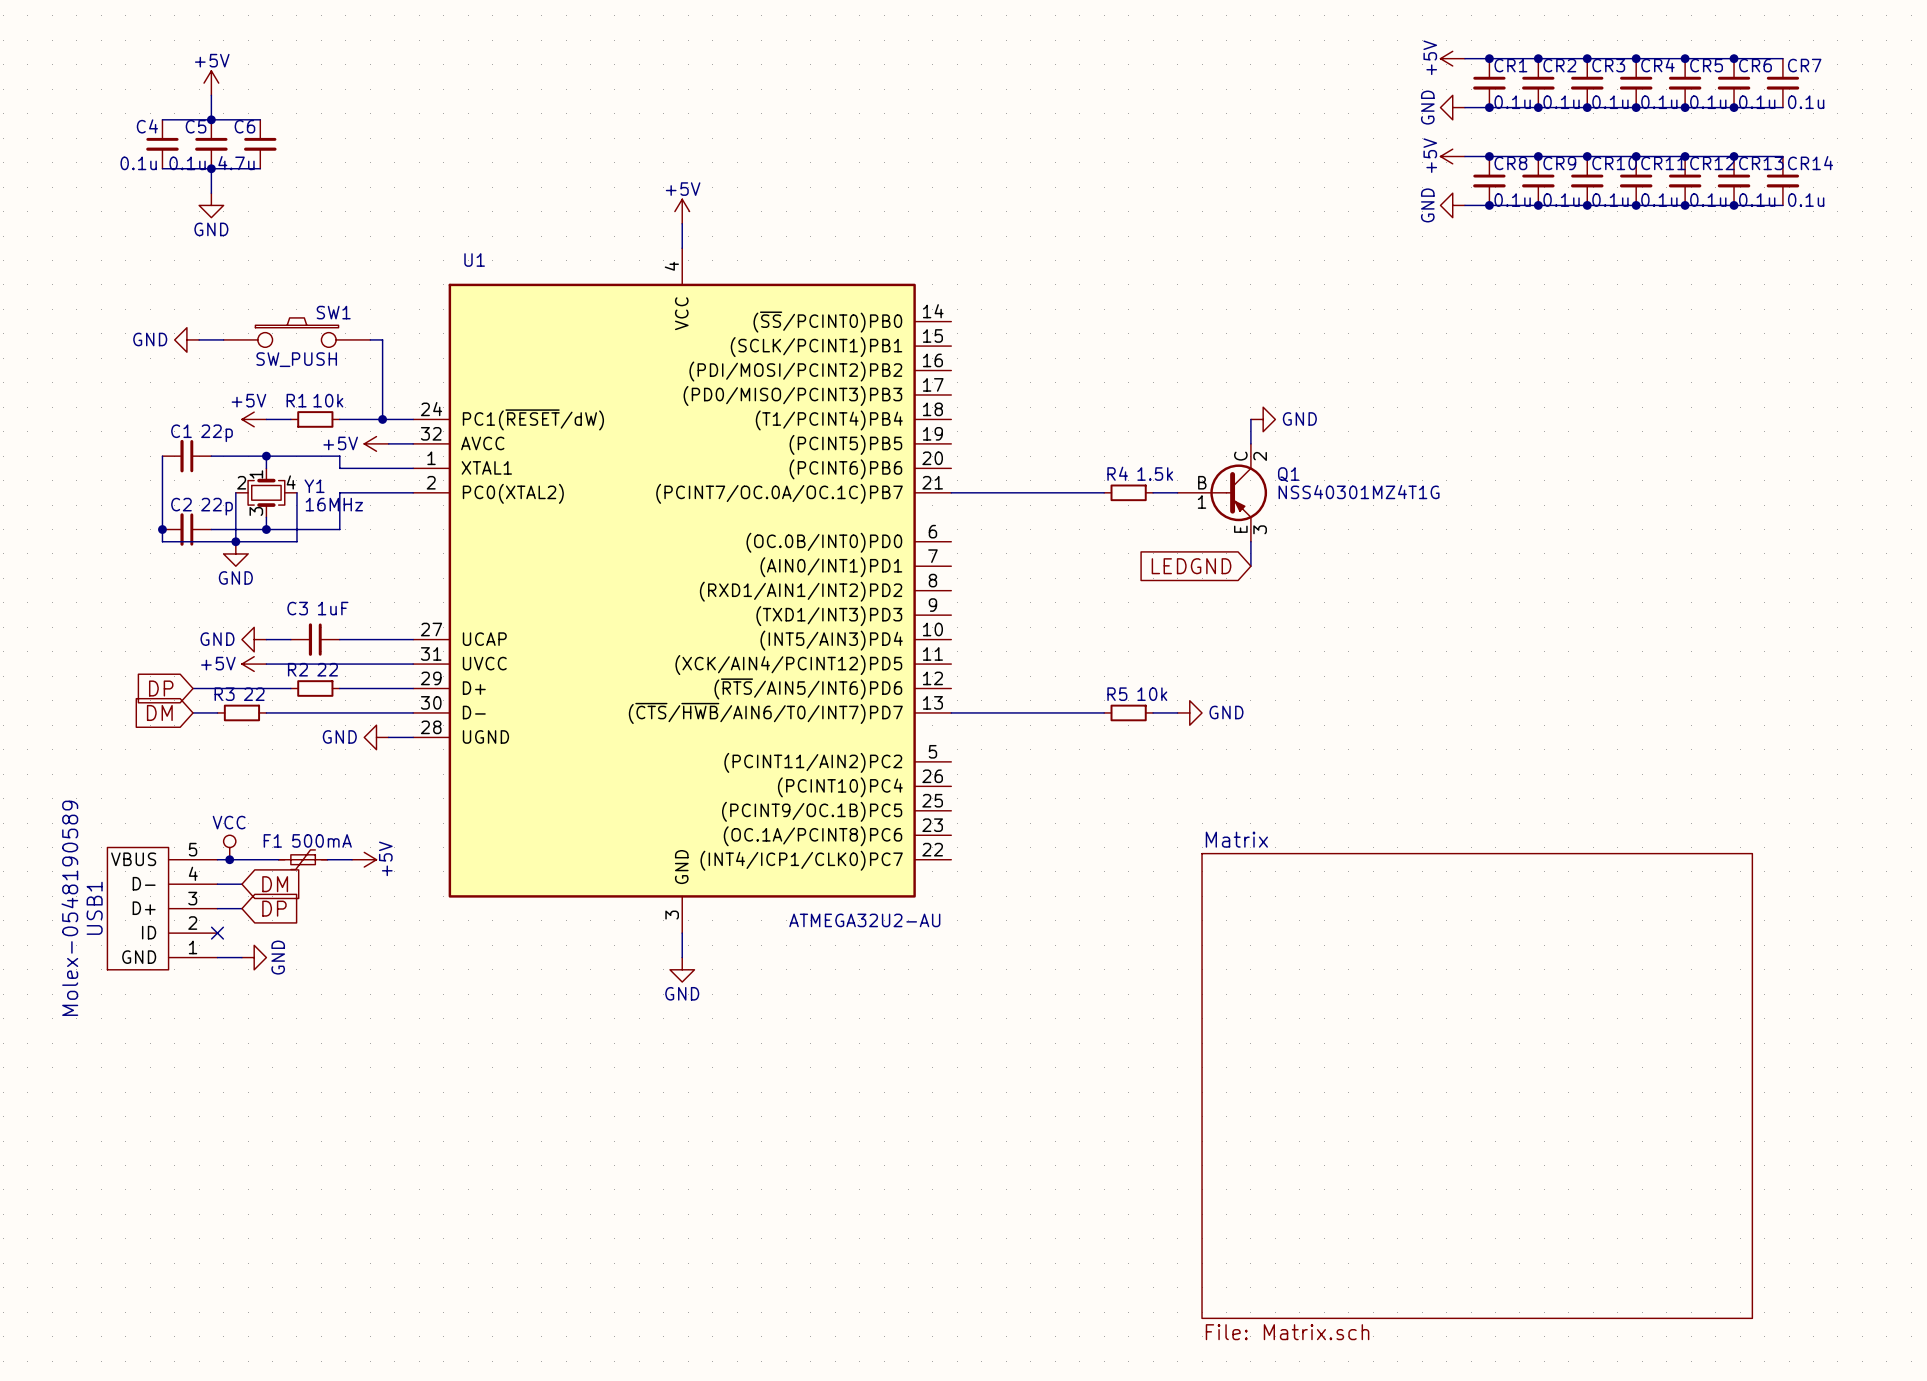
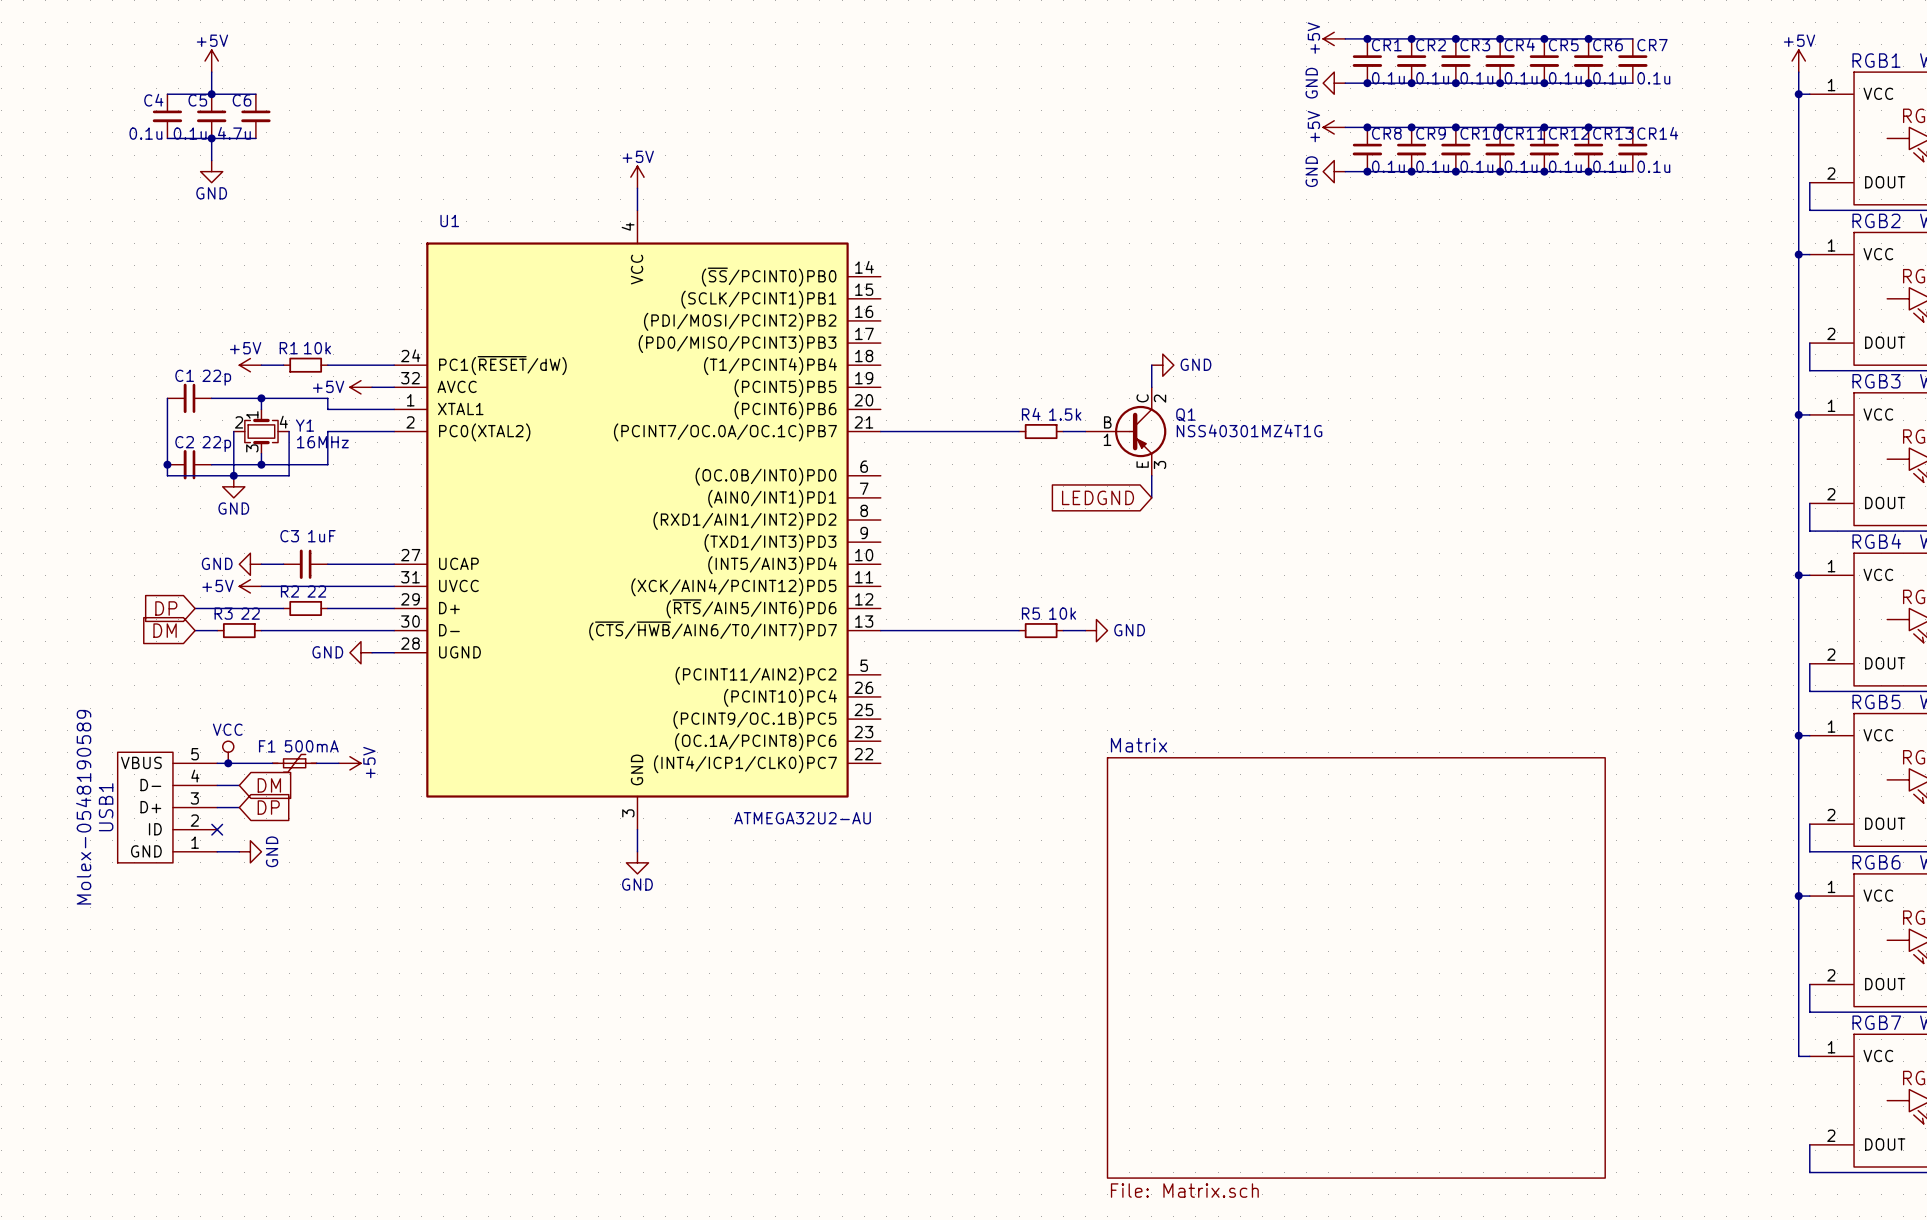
SW1: SW_PUSH (296, 332) -> none
power symbol: GND (186, 339) -> none
wire: (199, 339) (223, 339) -> none
wire: (370, 339) (382, 339) (382, 419) -> none
junction: (382, 419) -> none

